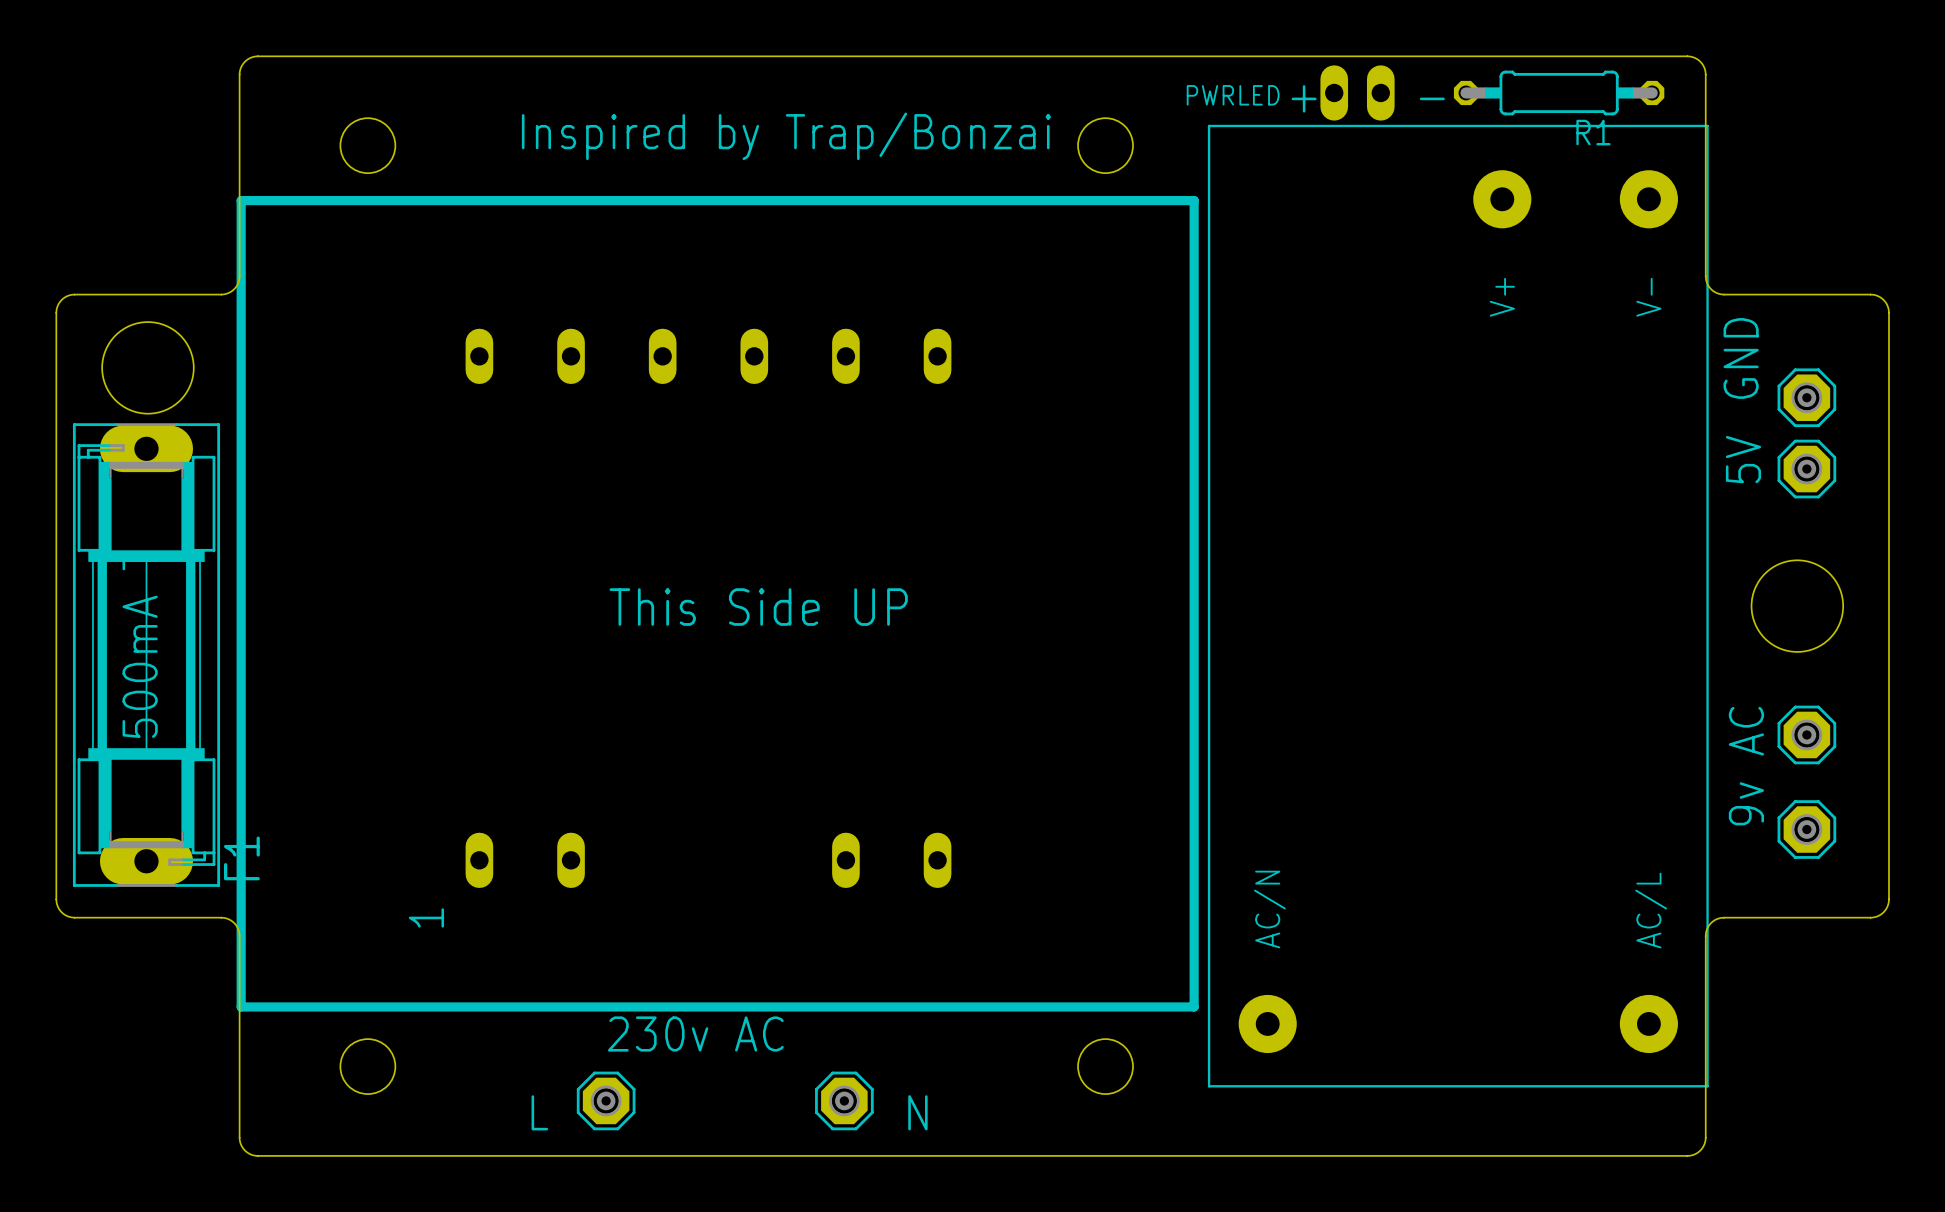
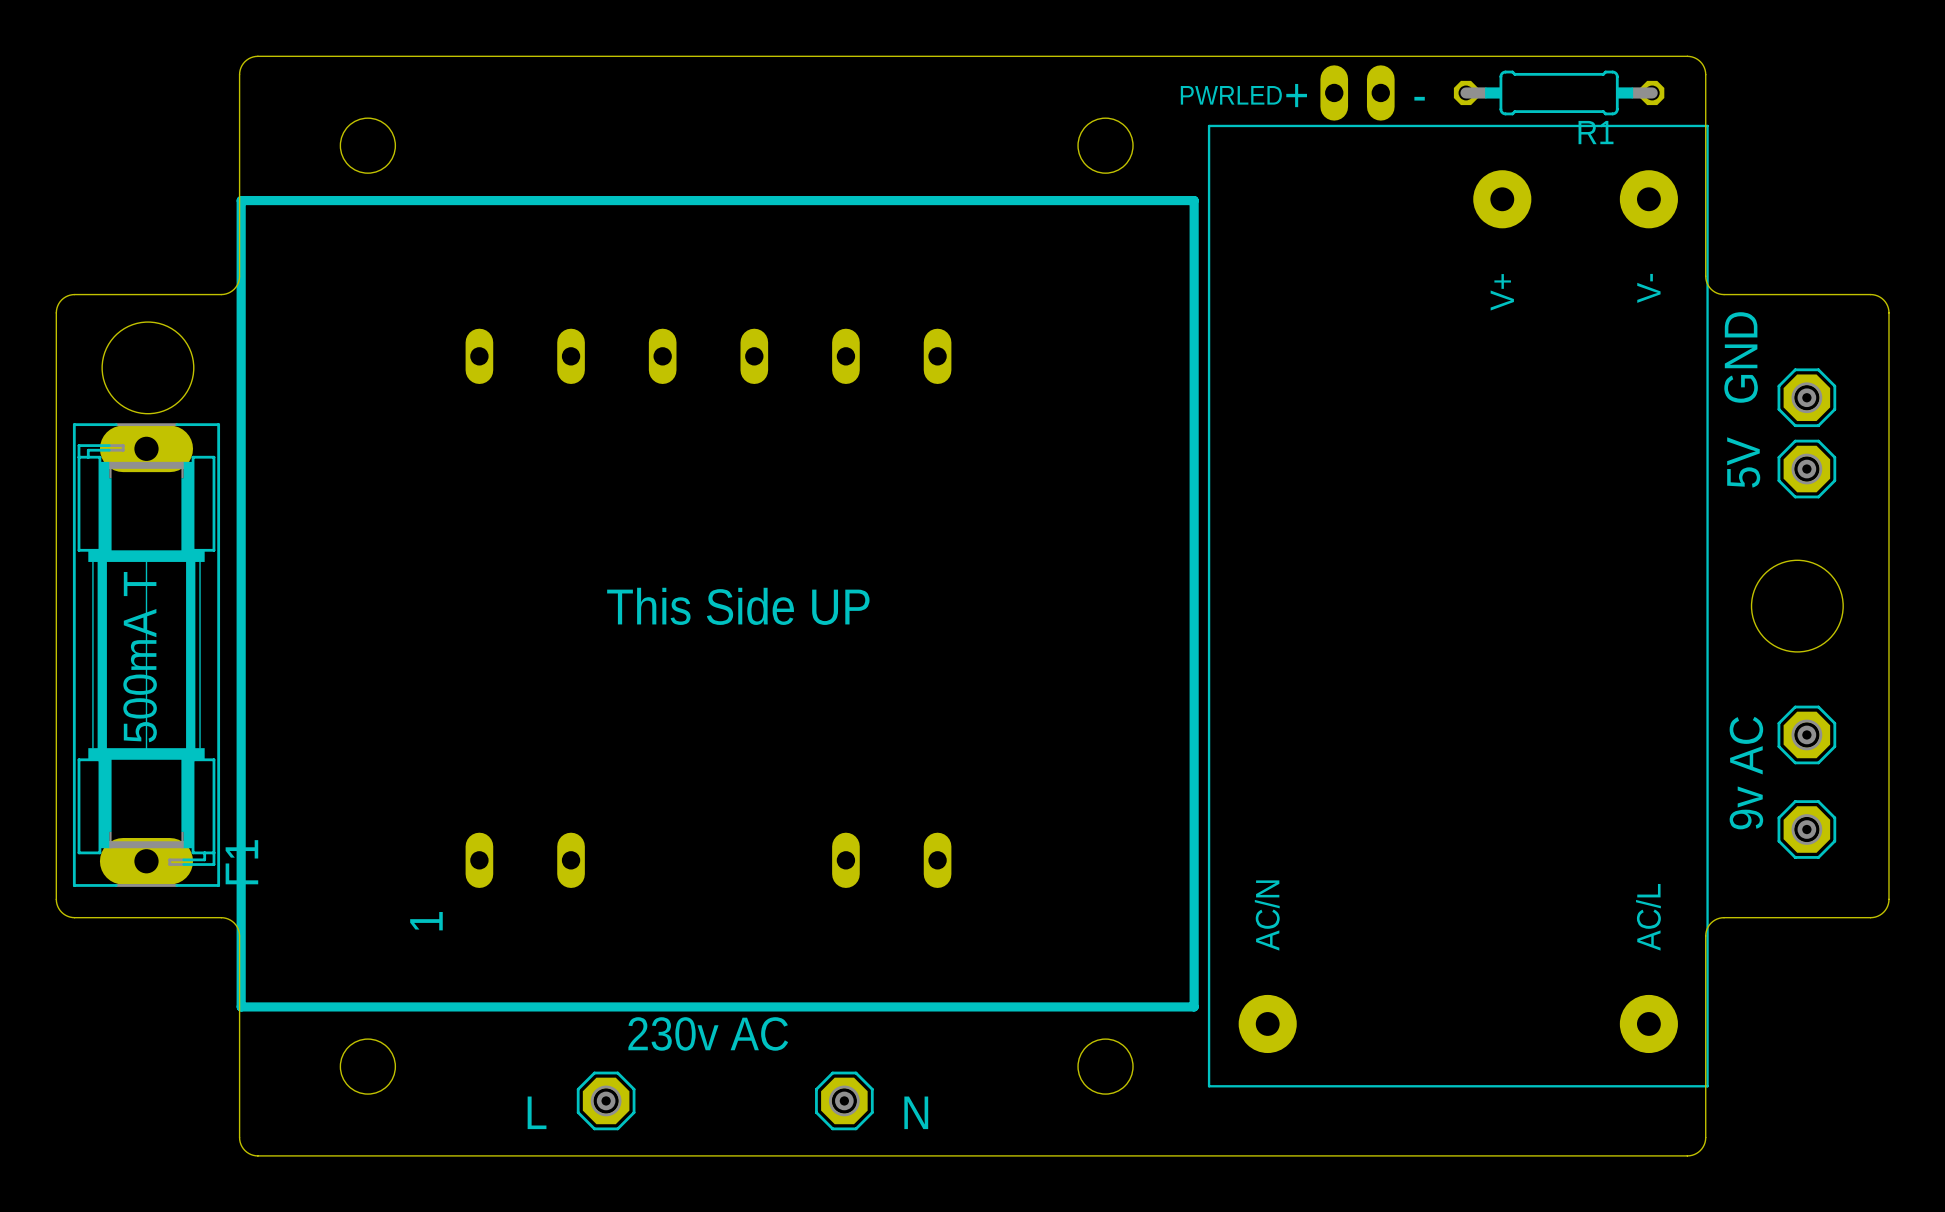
text: Inspired by Trap/Bonzai (786, 136) -> none

